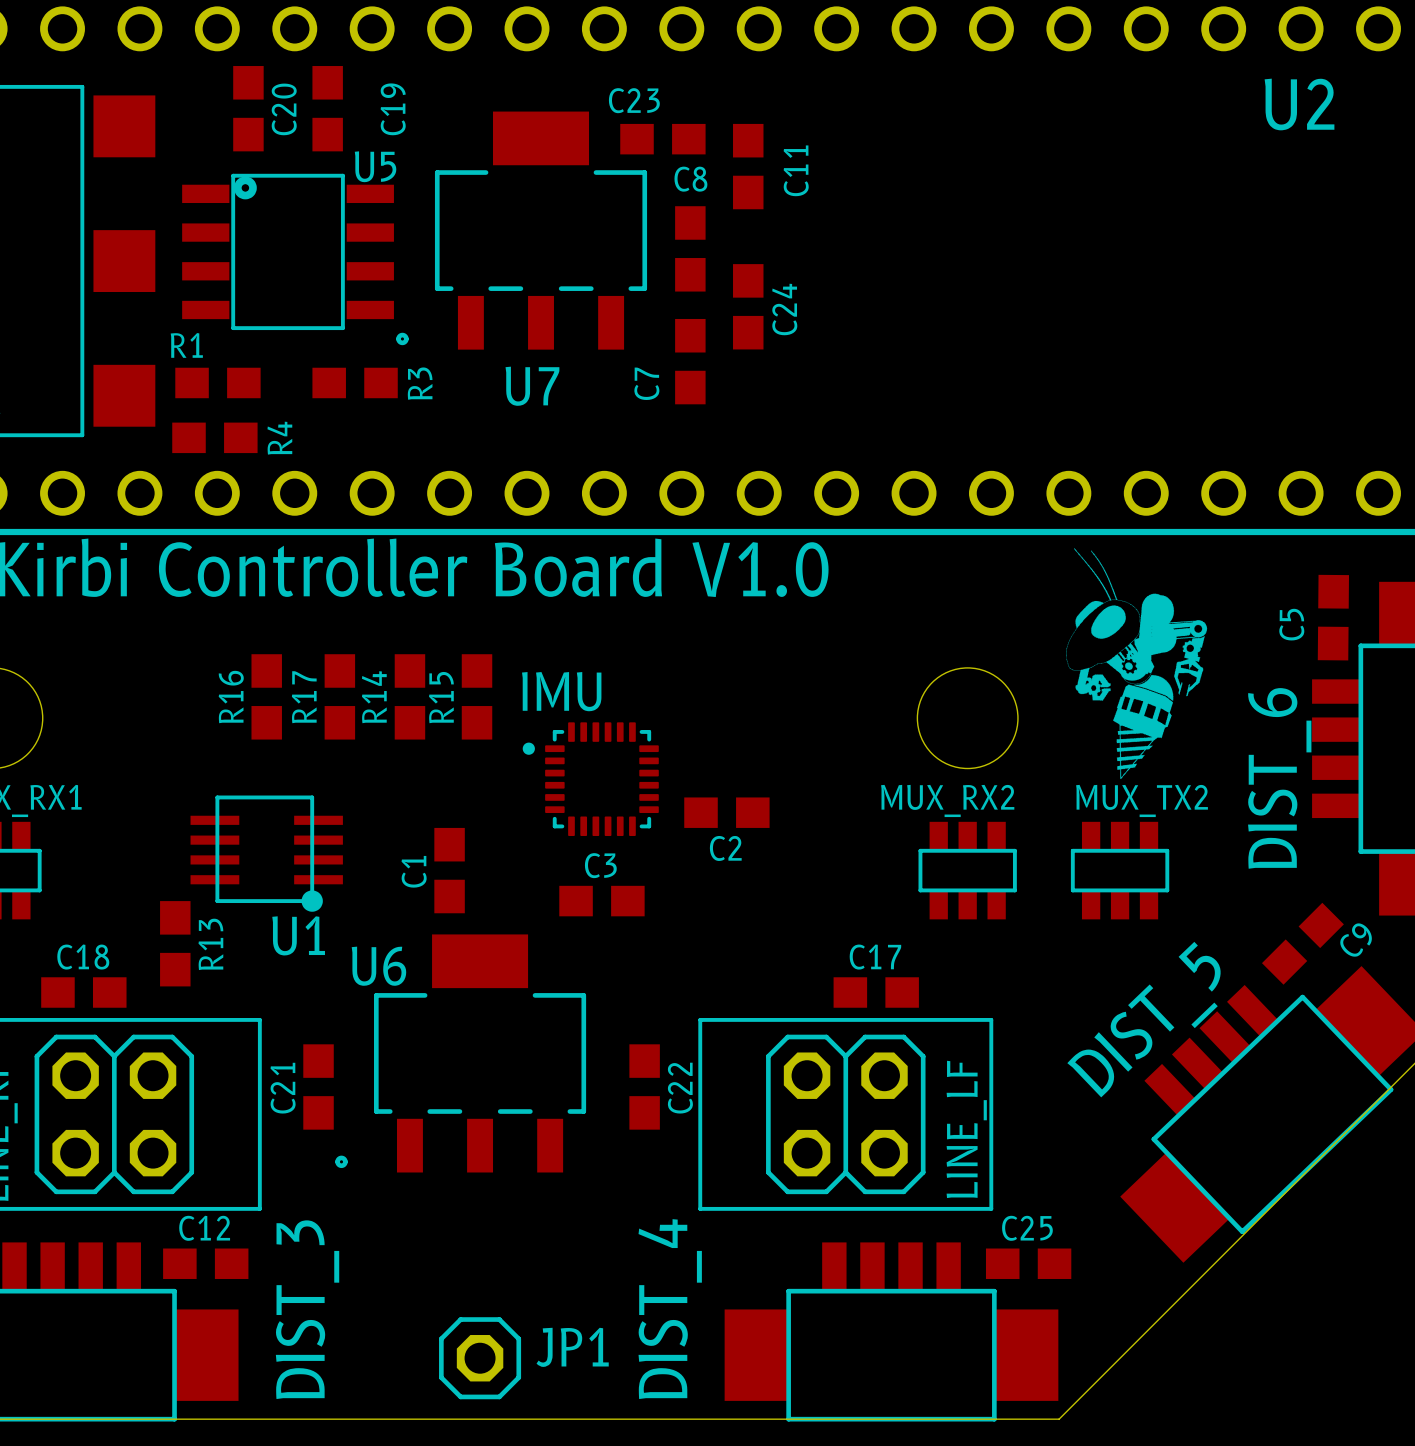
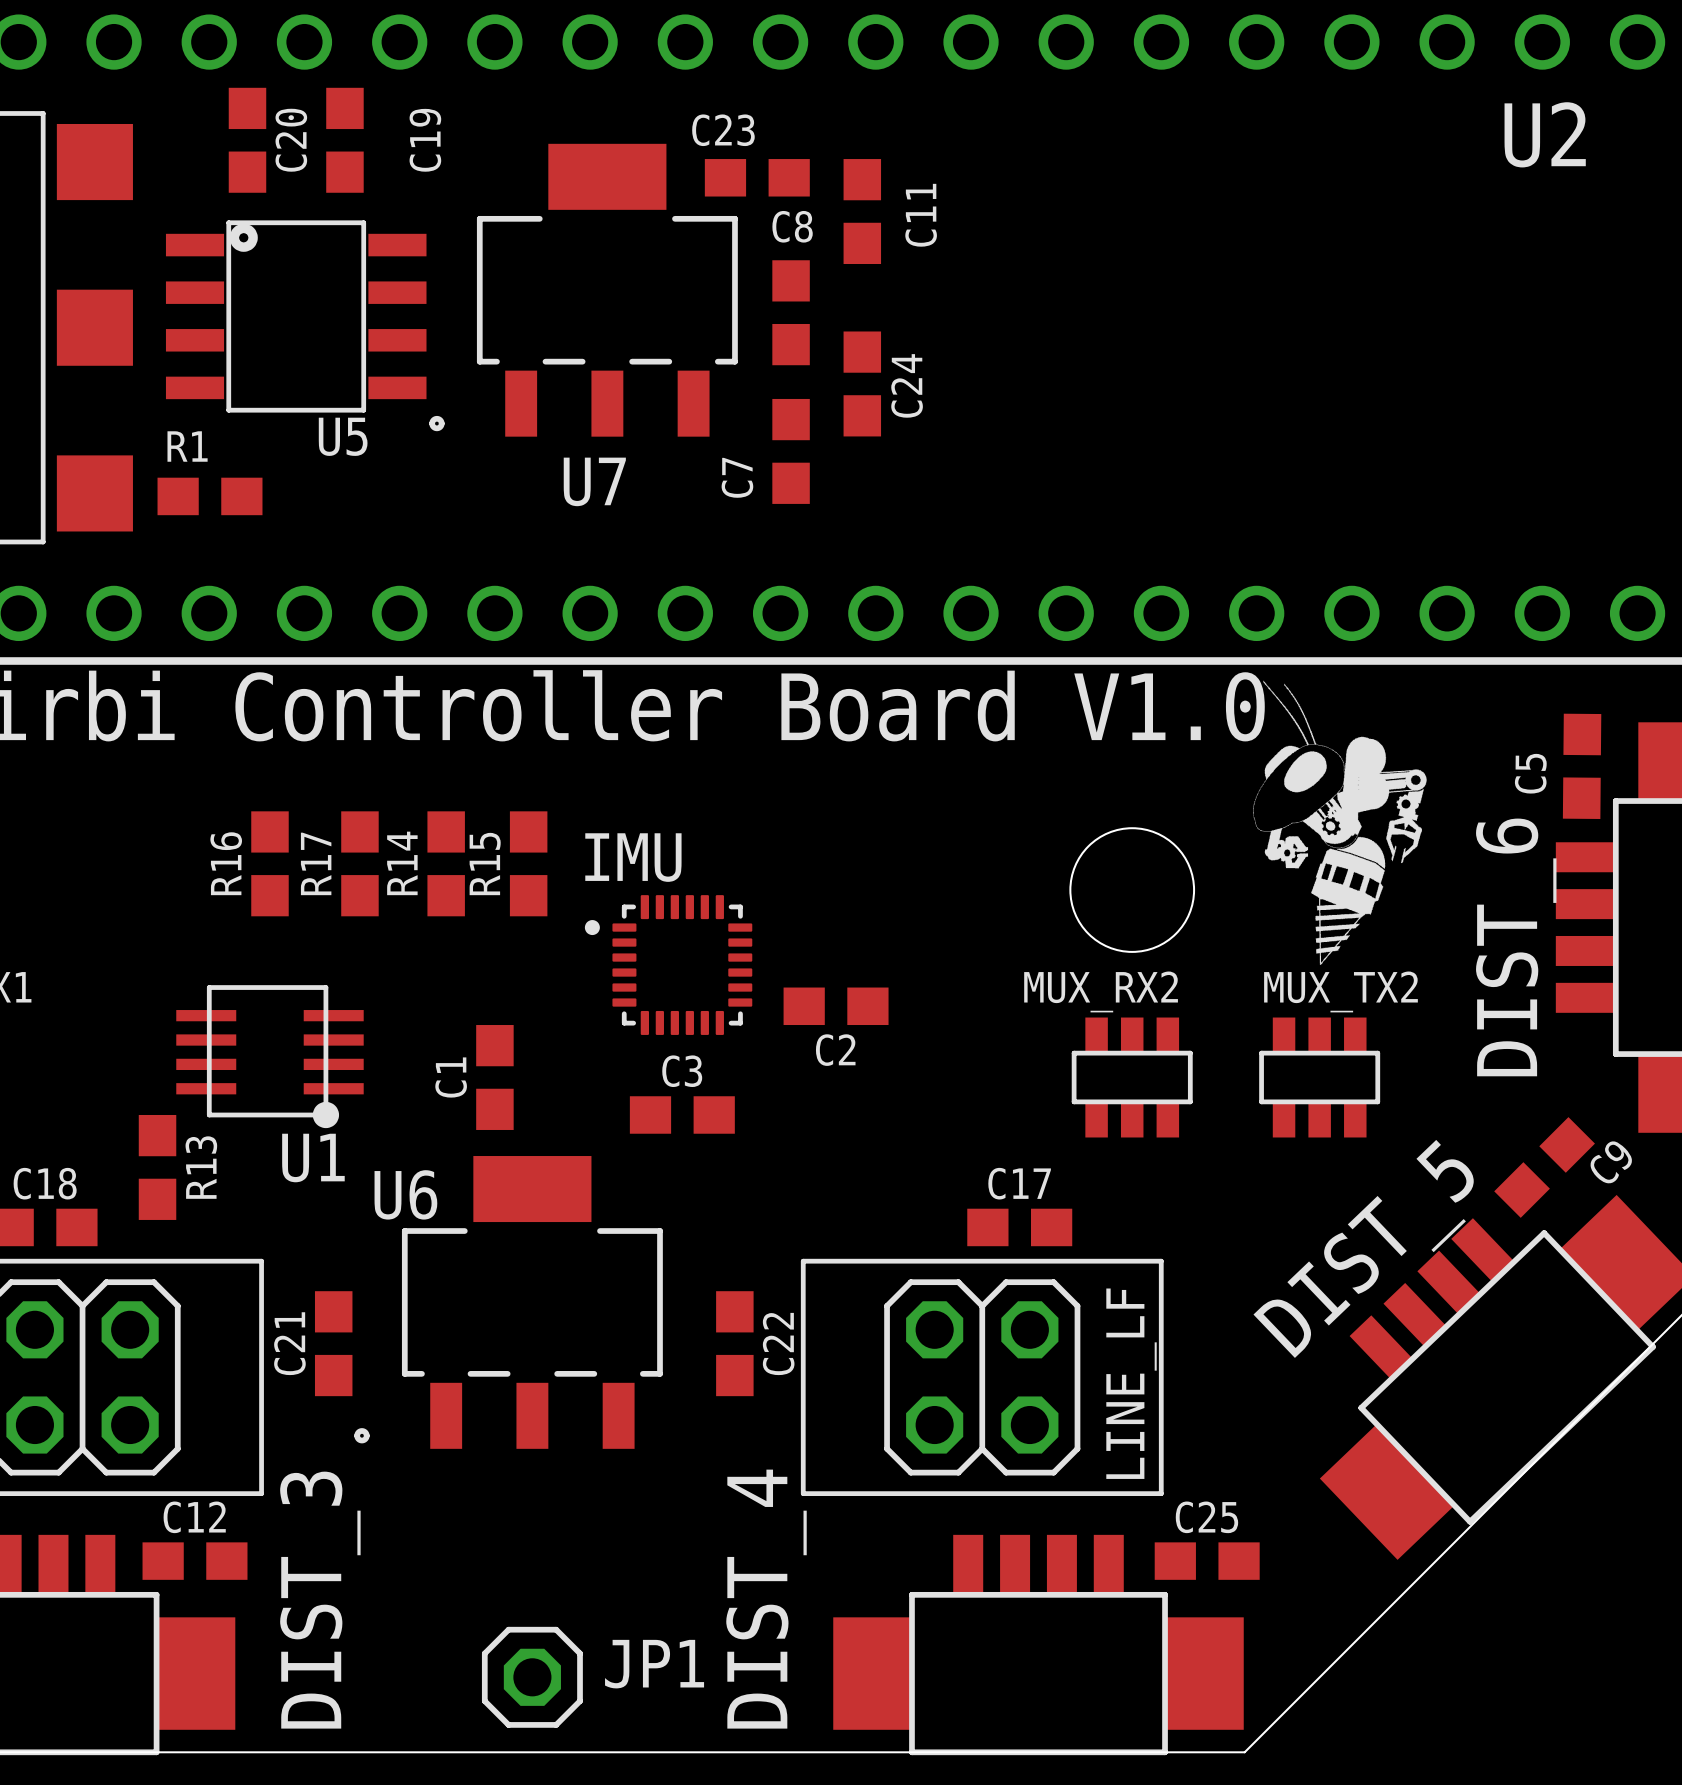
U5 name position: U5 (375, 166) -> U5 (343, 436)
R1 name position: R1 (186, 345) -> R1 (187, 446)
R1 position: (217, 382) -> (210, 496)
R3: (355, 382) -> none
R4: (214, 437) -> none

